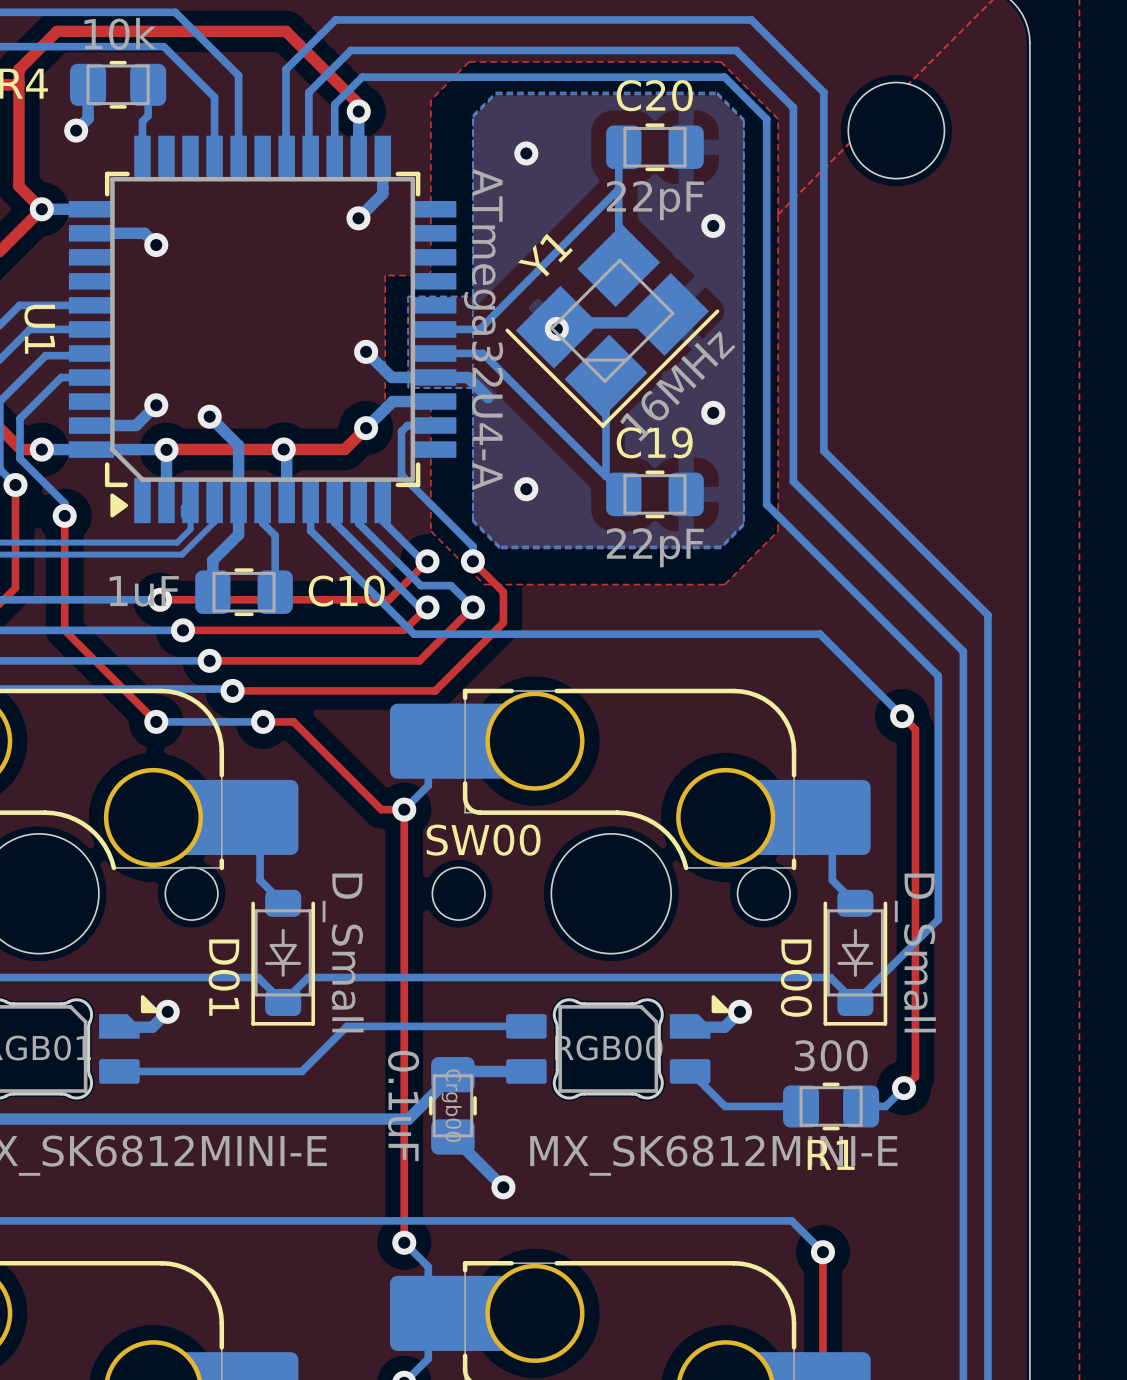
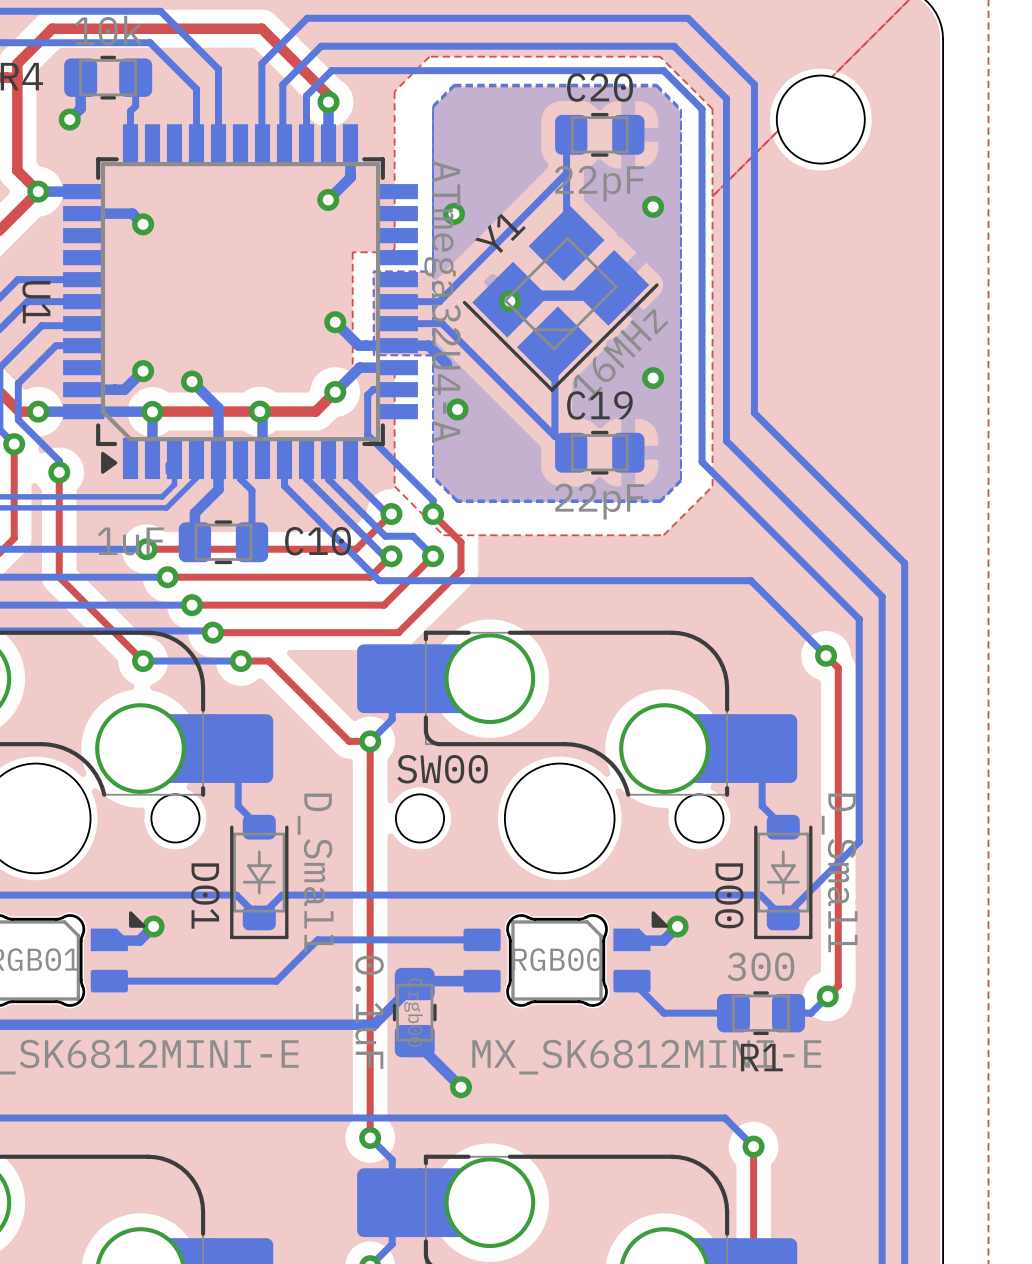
via position: (526, 153) -> (454, 213)
via position: (526, 489) -> (457, 409)

